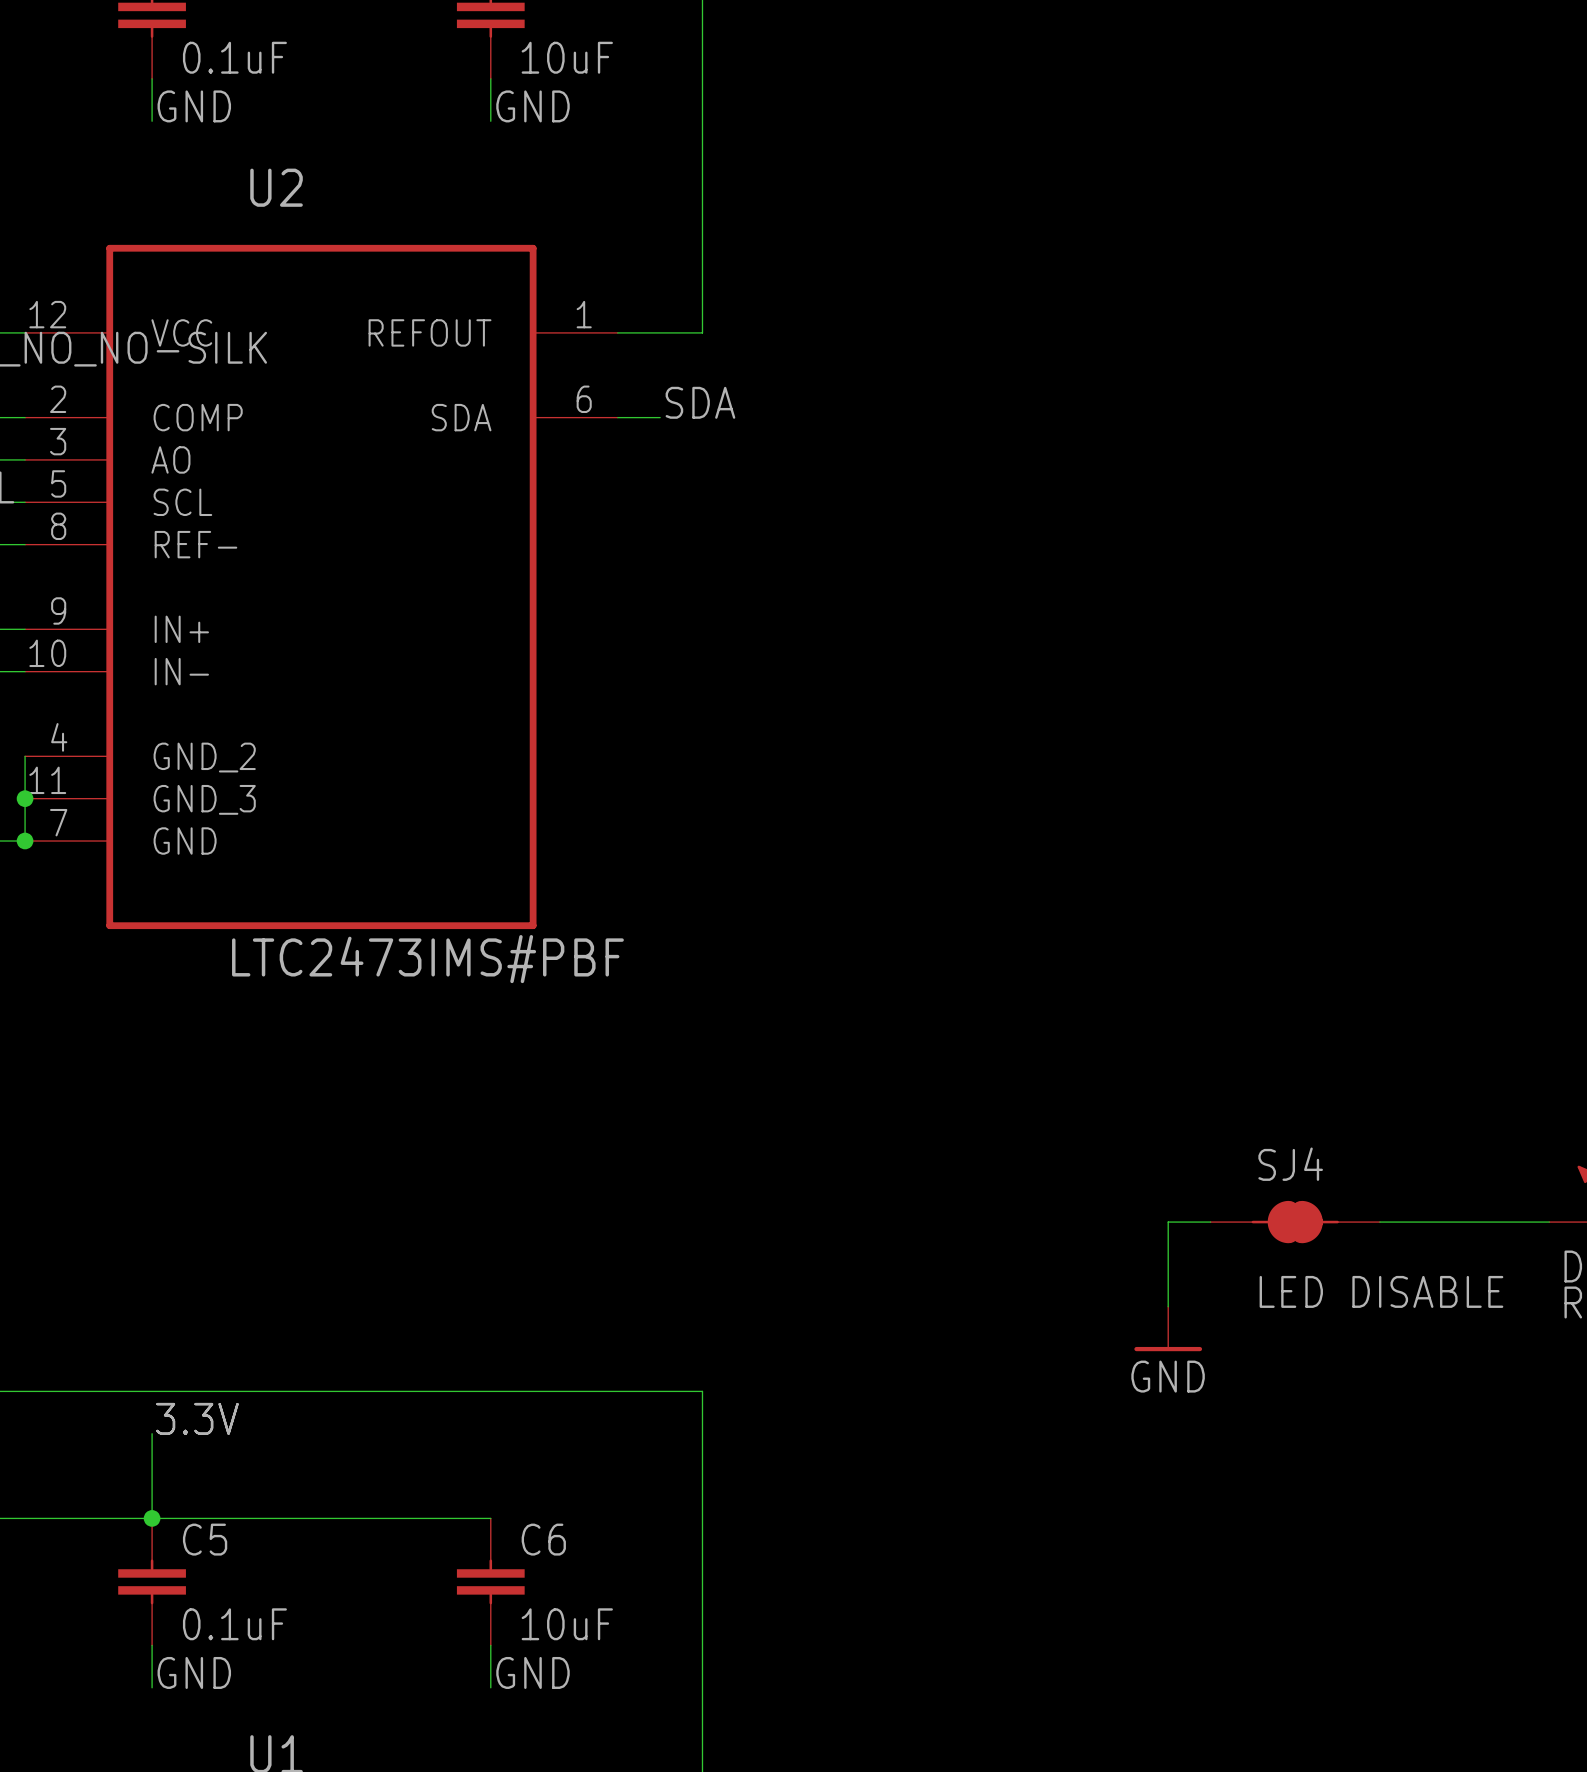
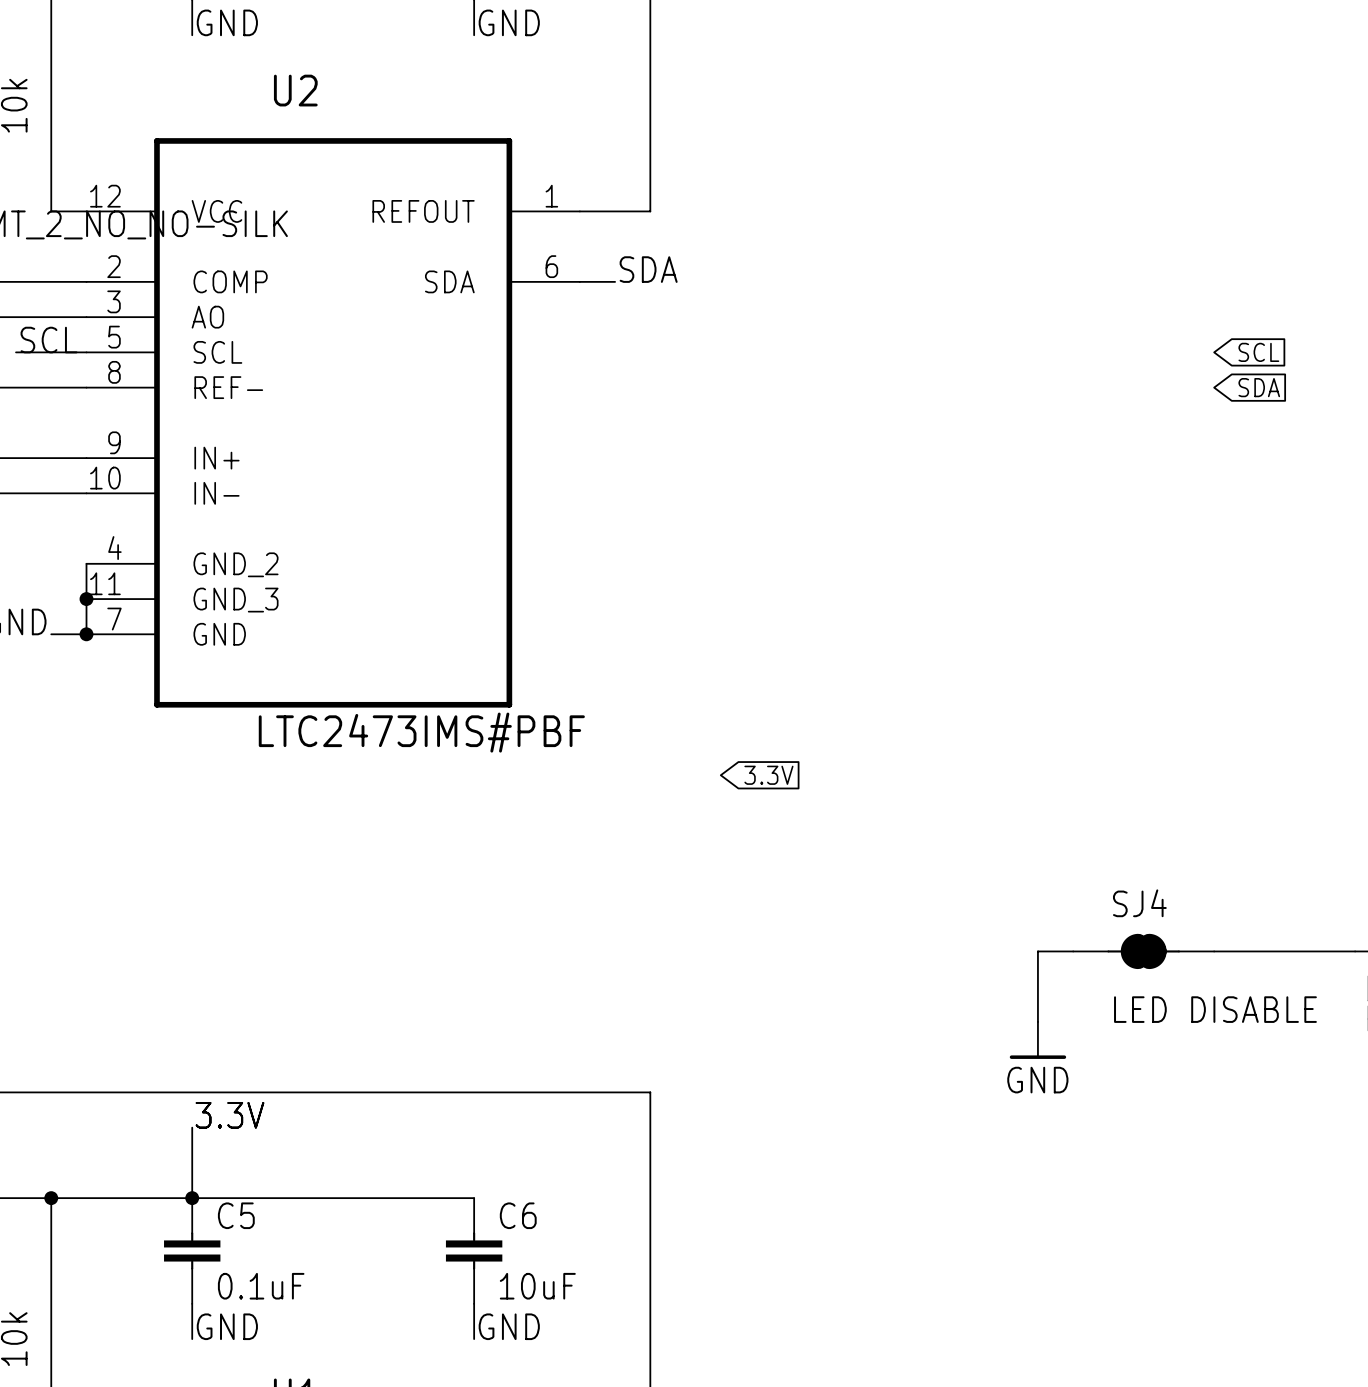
global label: none -> SCL (1258, 352)
global label: none -> SDA (1259, 387)
global label: none -> 3.3V (768, 775)

